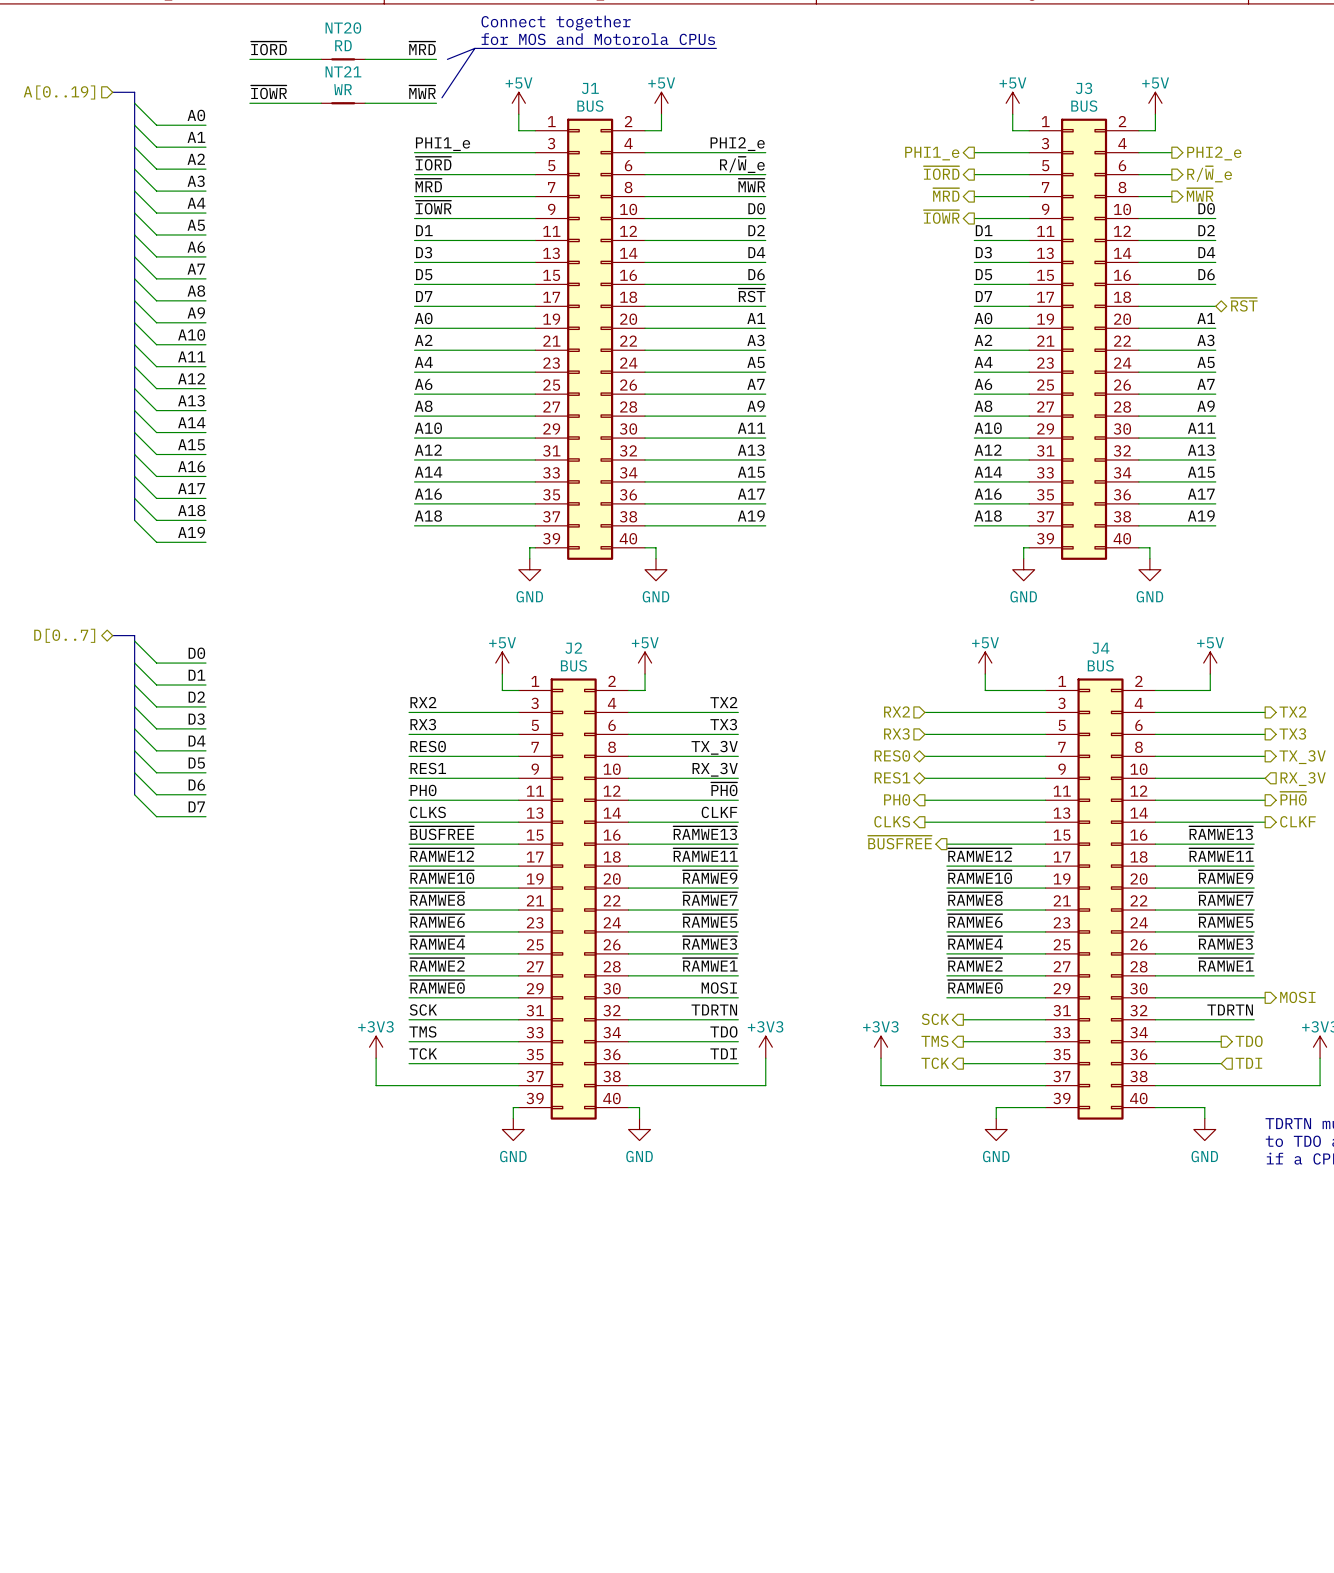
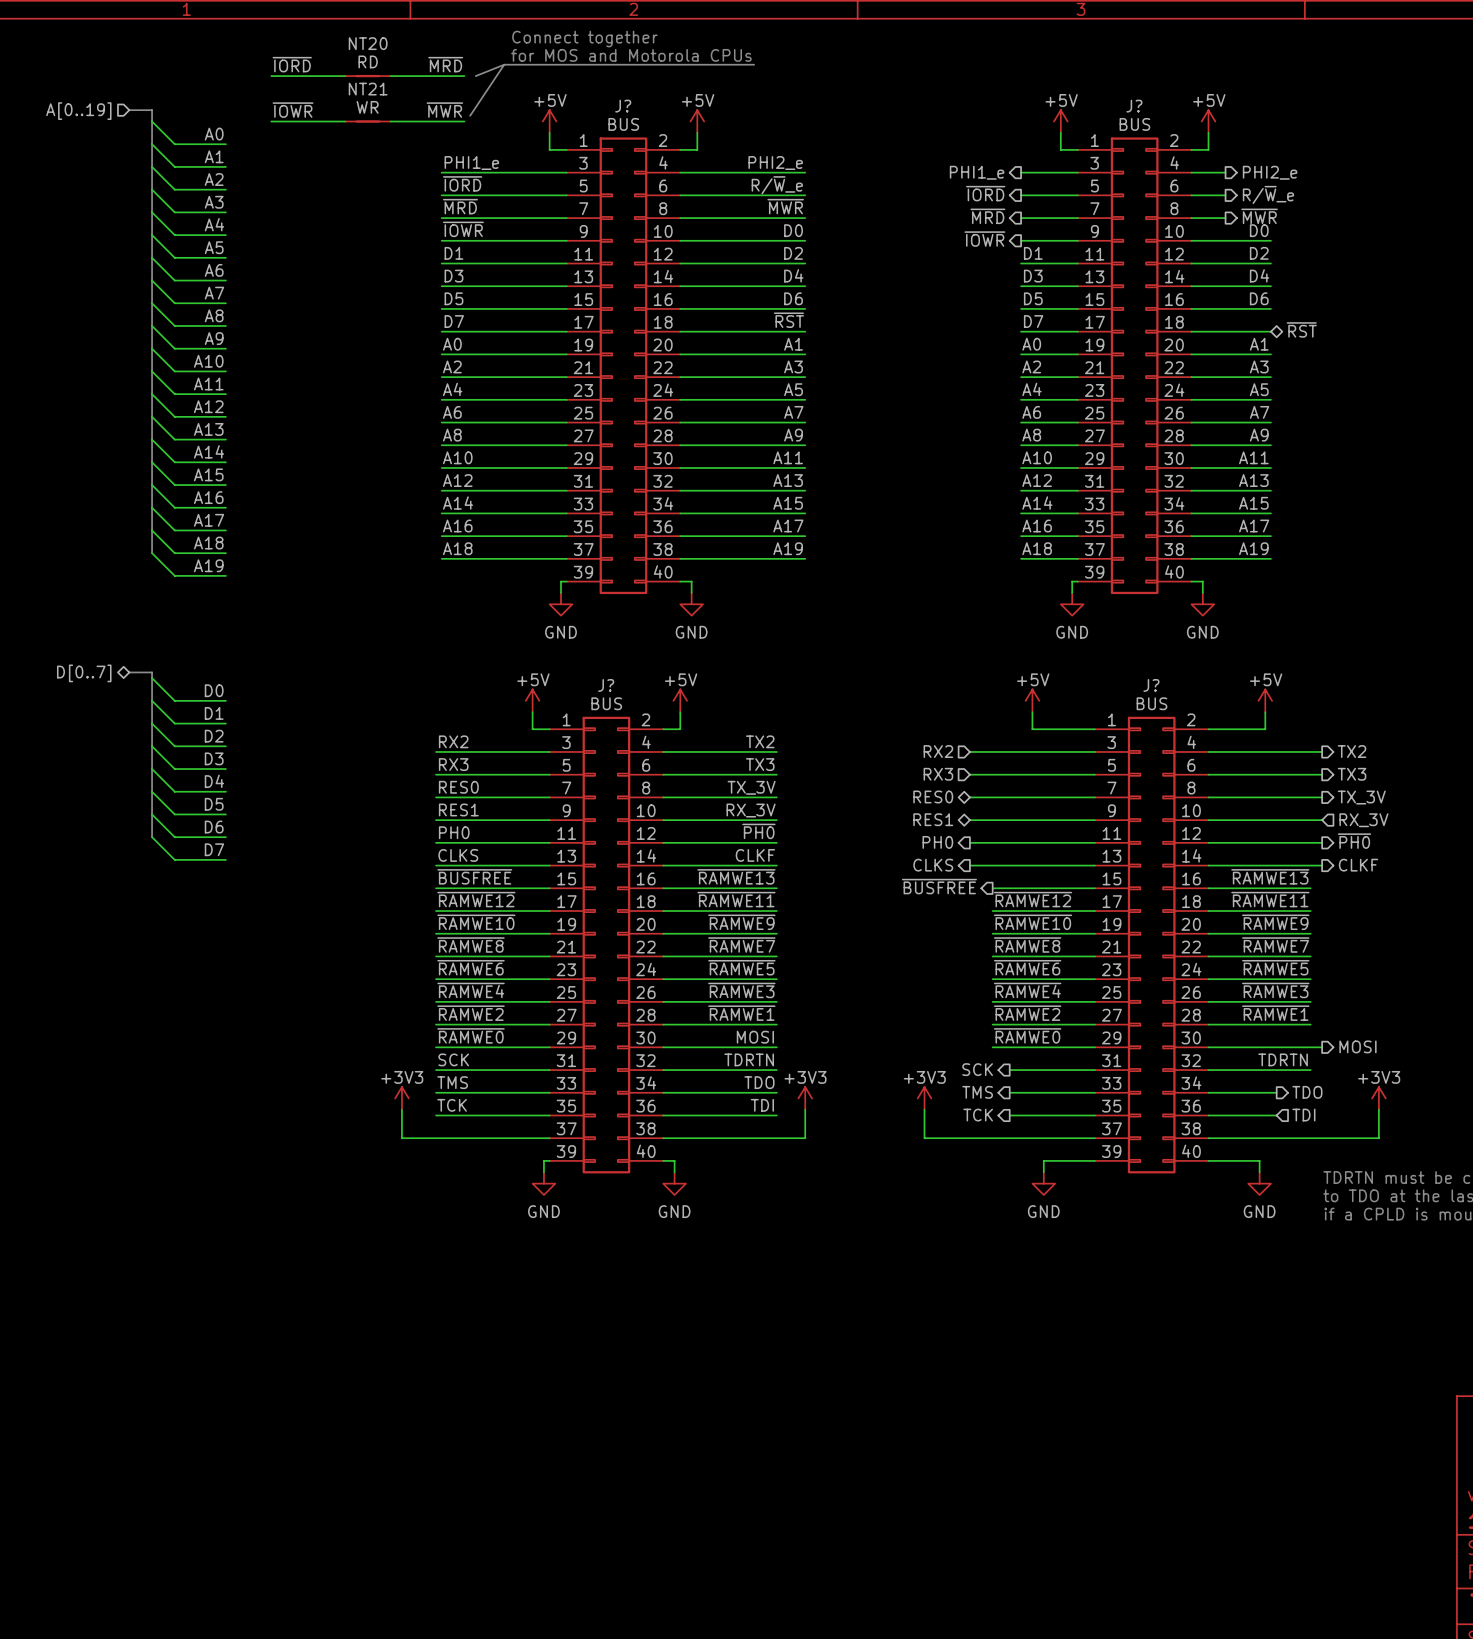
J1 name: J1 (590, 88) -> J? (623, 106)
J3 name: J3 (1083, 88) -> J? (1134, 106)
J2 name: J2 (573, 648) -> J? (606, 685)
J4 name: J4 (1100, 648) -> J? (1151, 685)

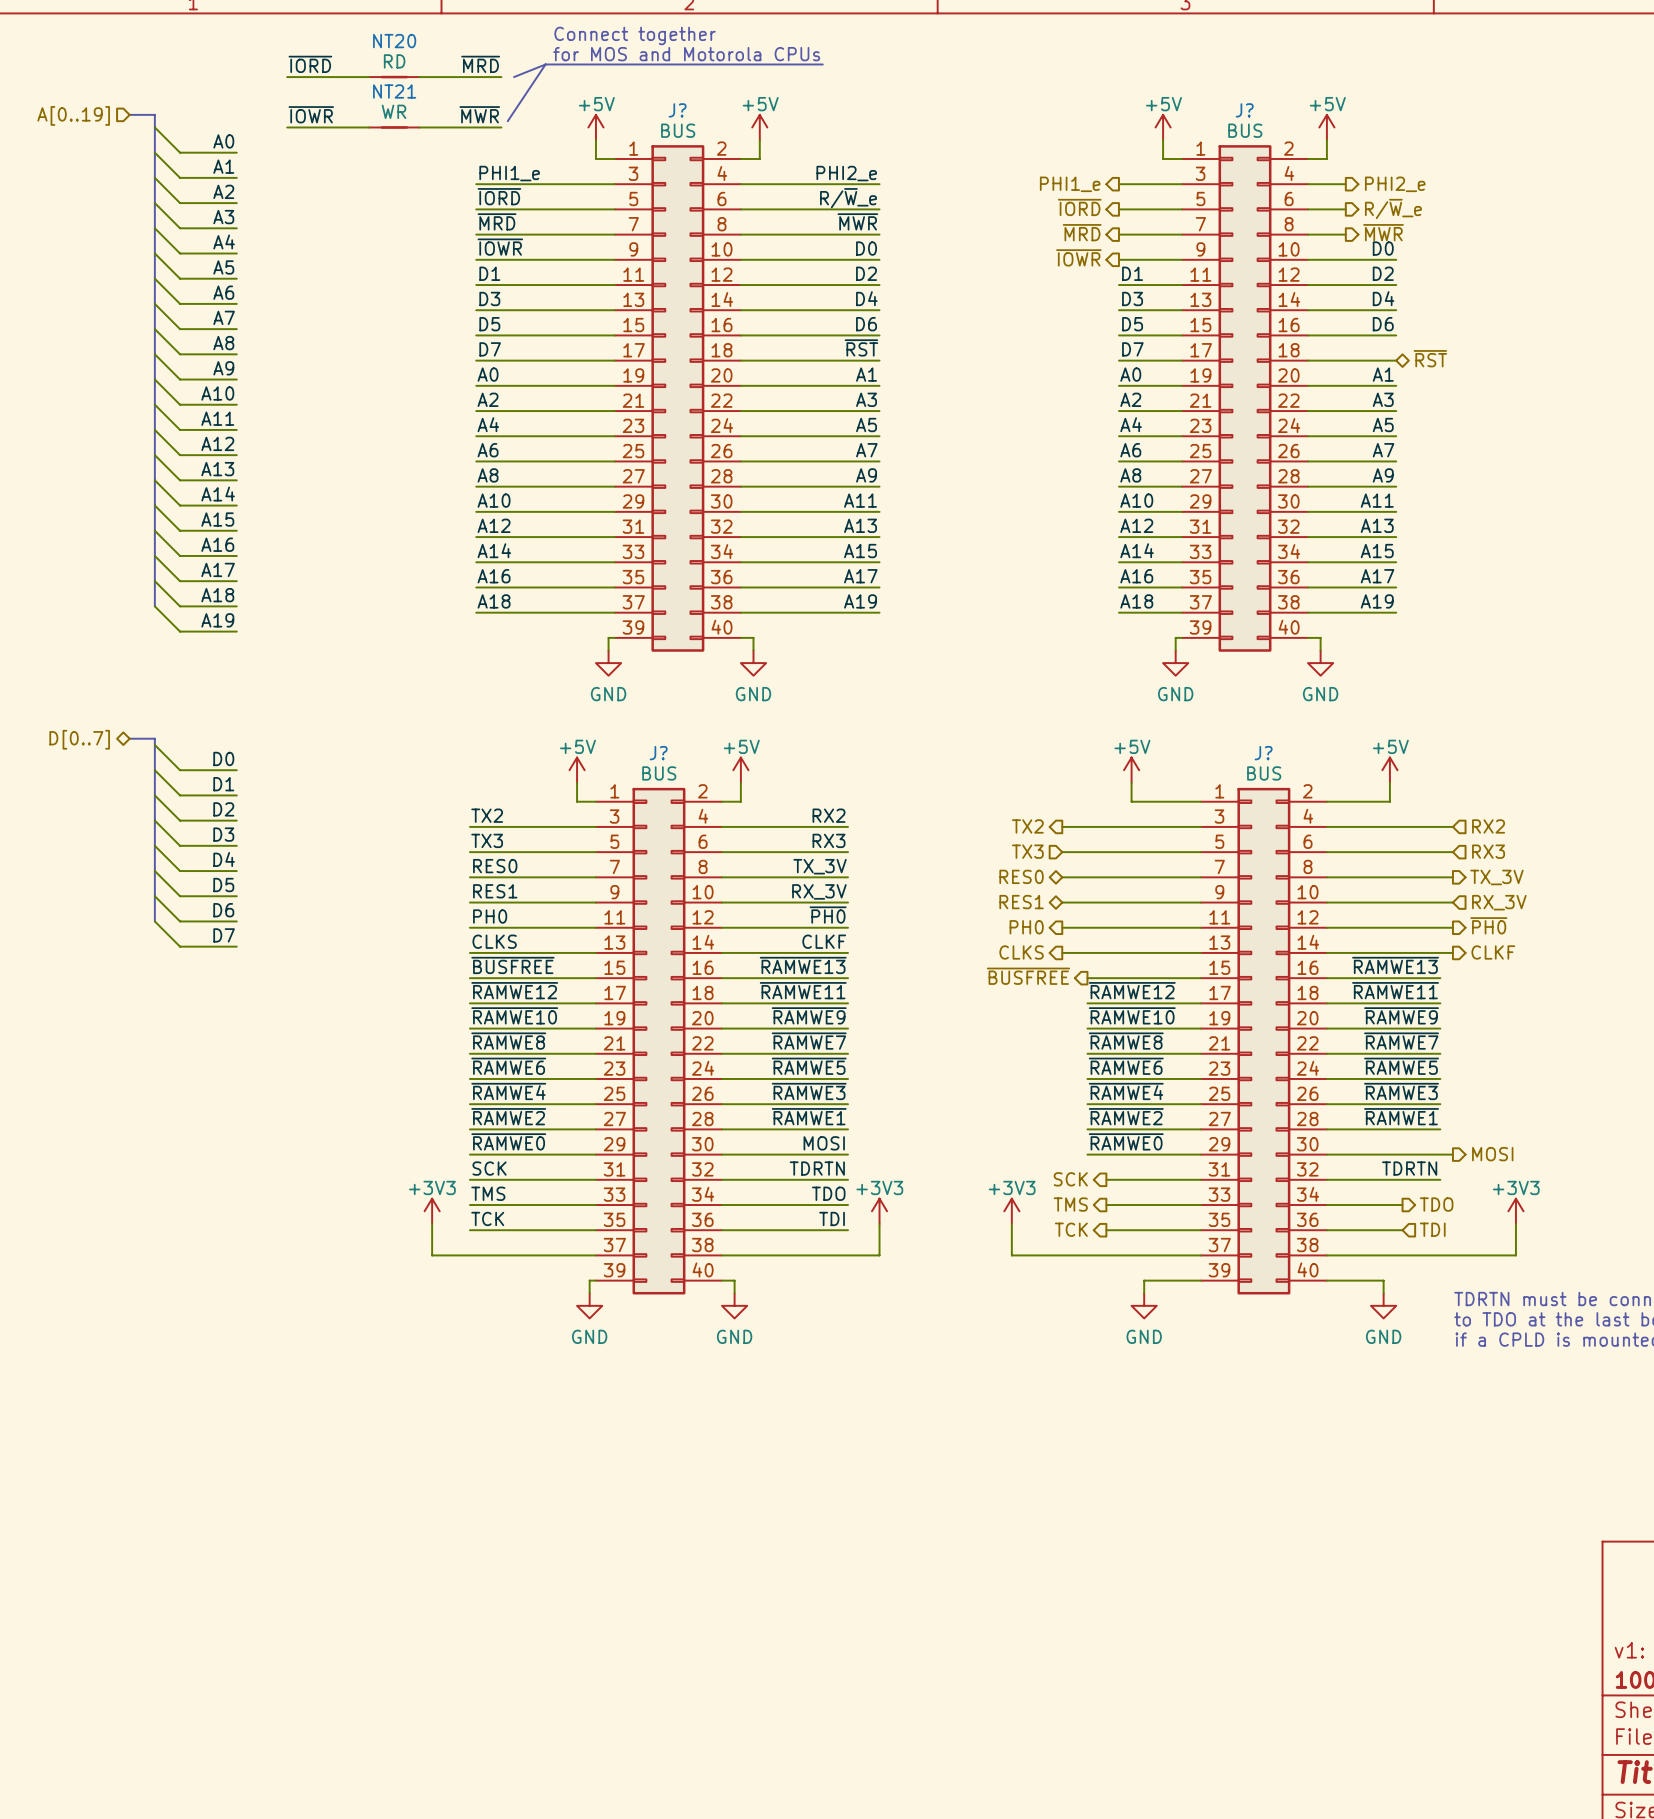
label: RX2 (453, 741) -> TX2 (487, 815)
label: TX2 (760, 741) -> RX2 (829, 815)
hierarchical label shape: input (938, 751) -> output (1027, 826)
hierarchical label: RX2 (938, 751) -> TX2 (1027, 826)
hierarchical label shape: output (1352, 751) -> input (1488, 826)
hierarchical label: TX2 (1352, 751) -> RX2 (1488, 826)
label: RX3 (453, 764) -> TX3 (487, 840)
label: TX3 (760, 764) -> RX3 (829, 840)
hierarchical label: RX3 (938, 774) -> TX3 (1027, 851)
hierarchical label shape: output (1352, 774) -> input (1488, 851)
hierarchical label: TX3 (1352, 774) -> RX3 (1488, 851)

